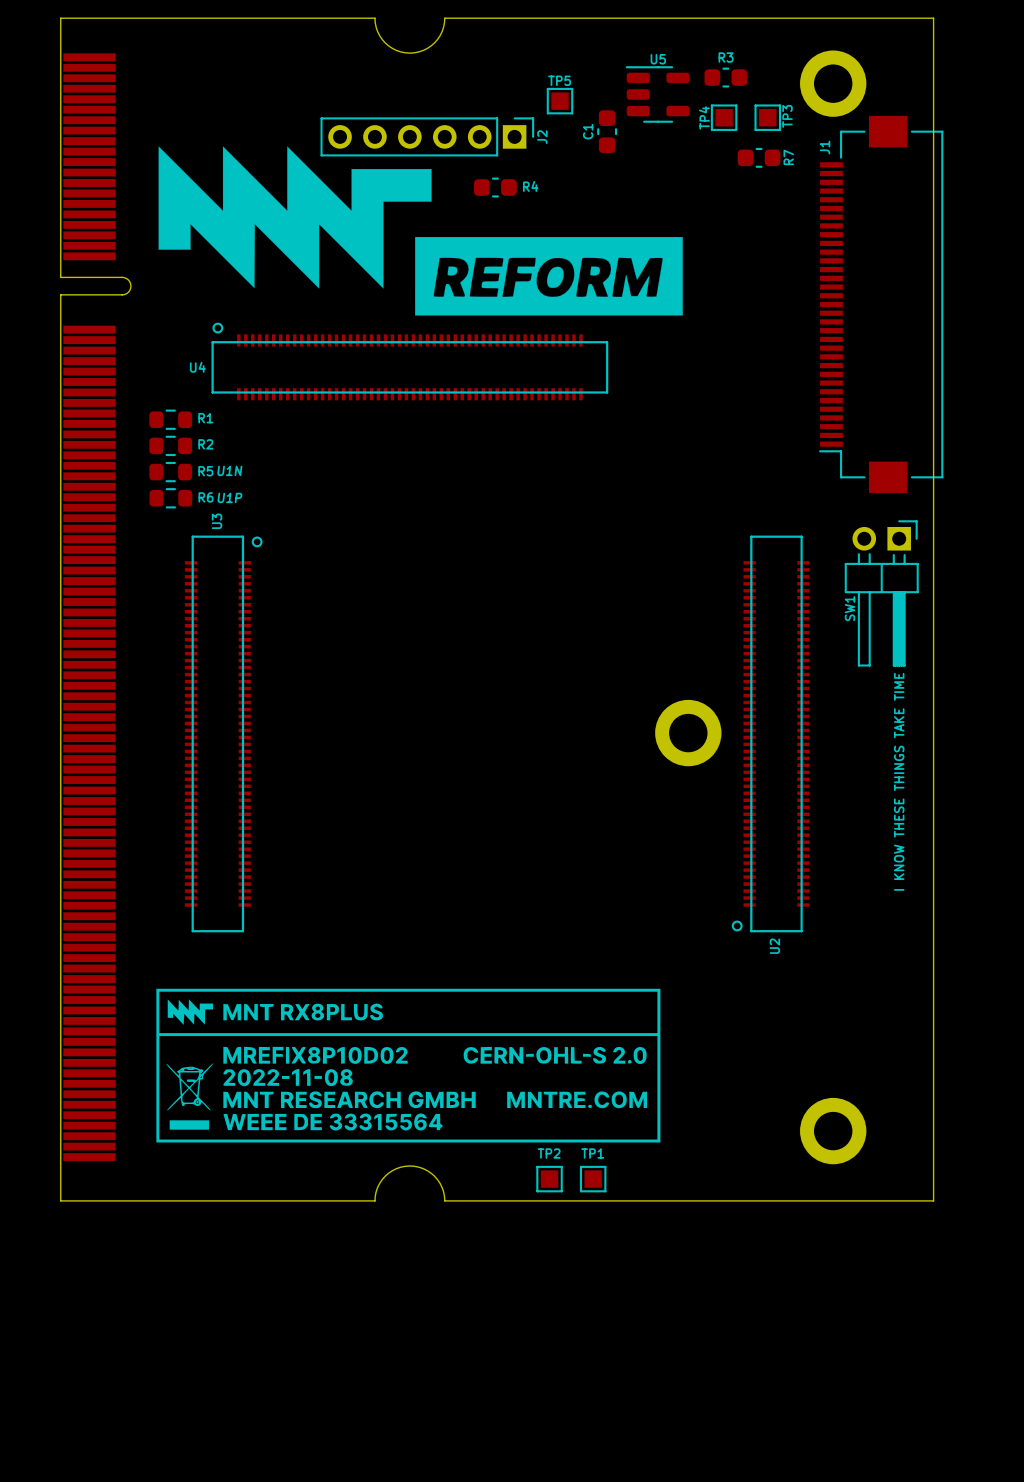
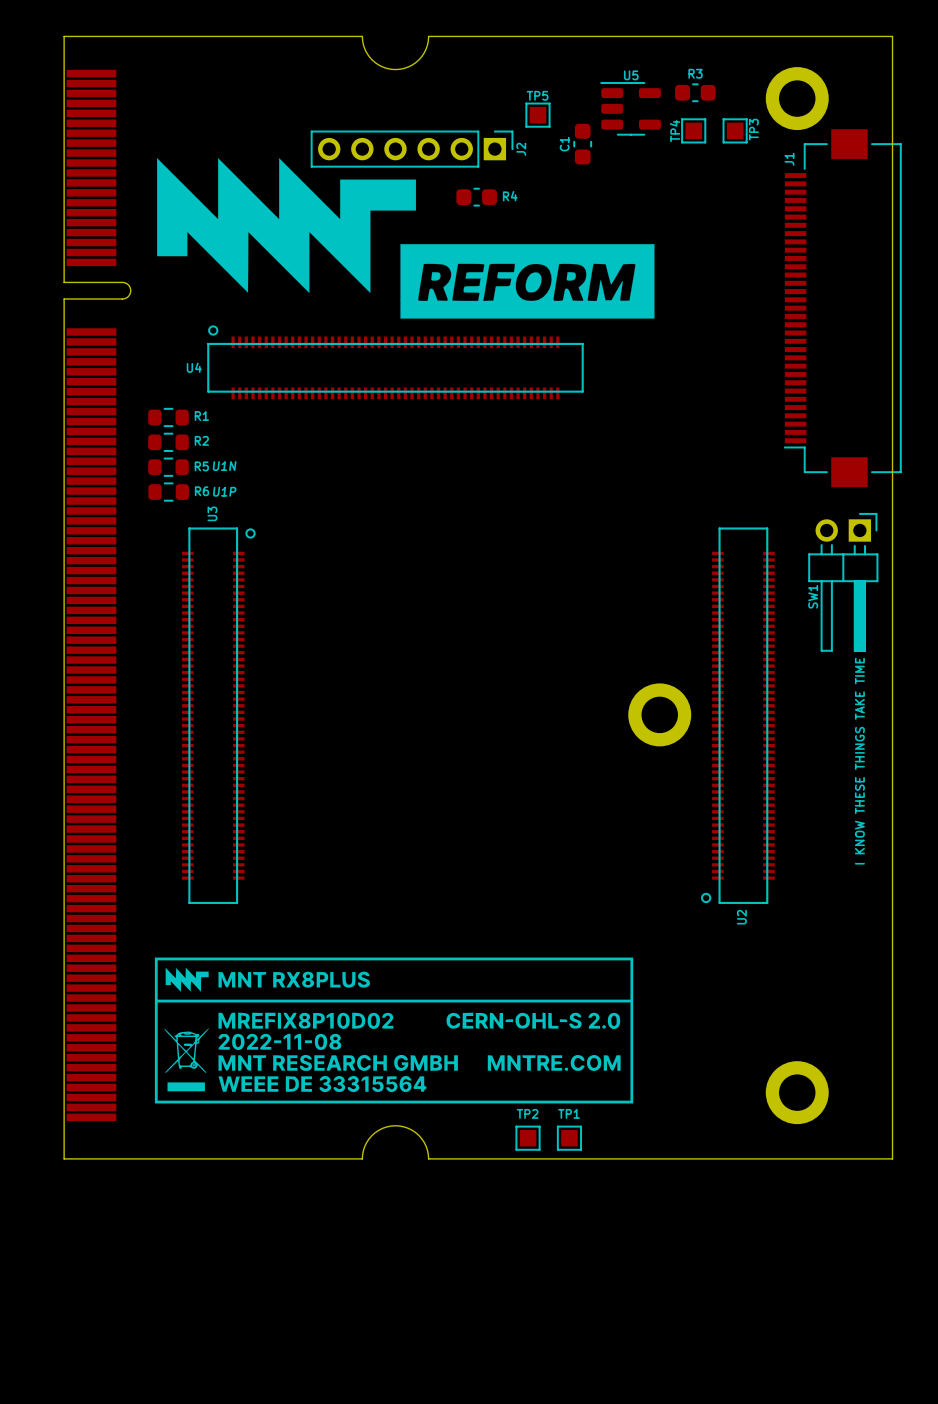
R7: (759, 157) -> none

